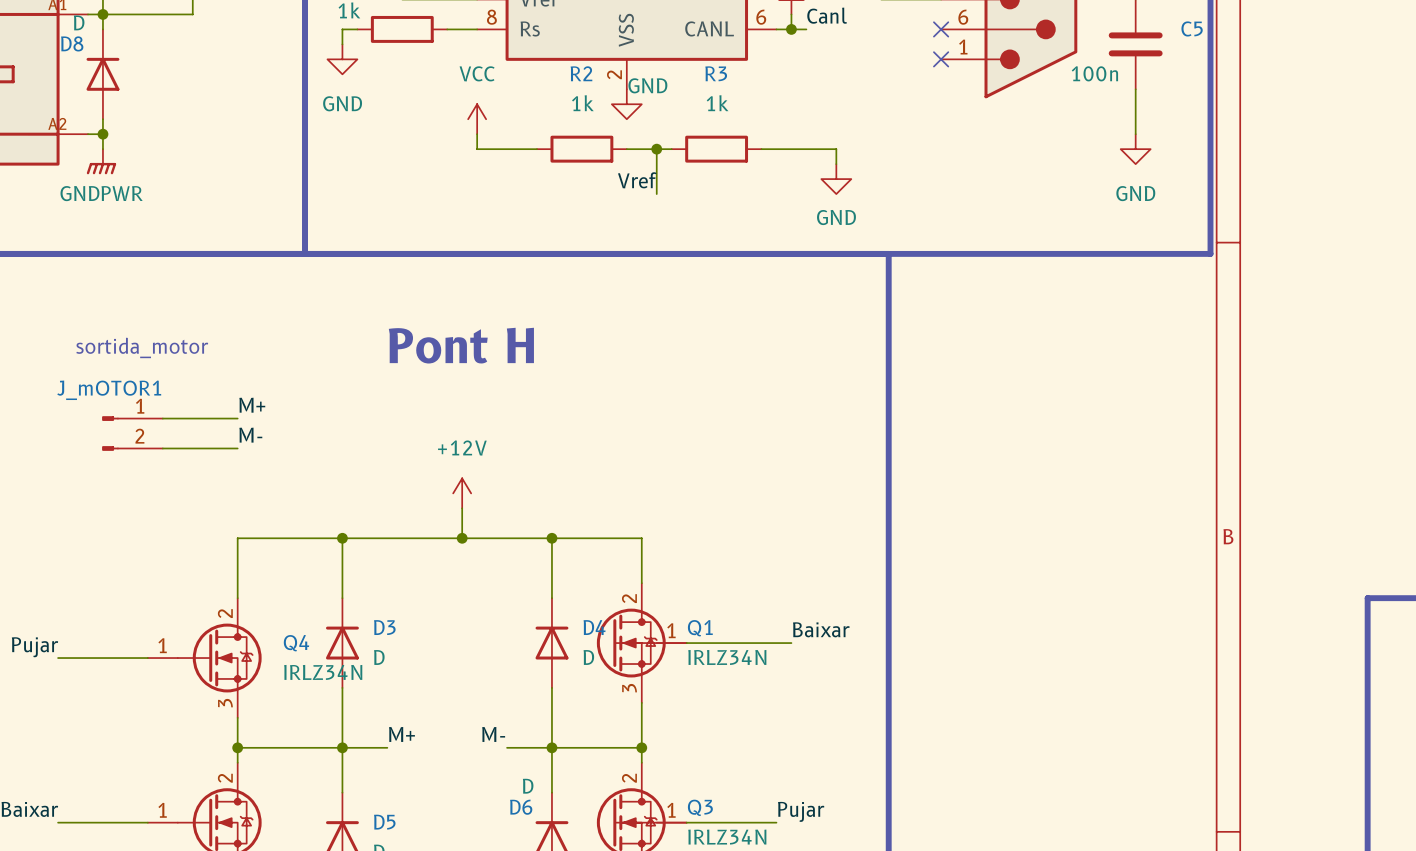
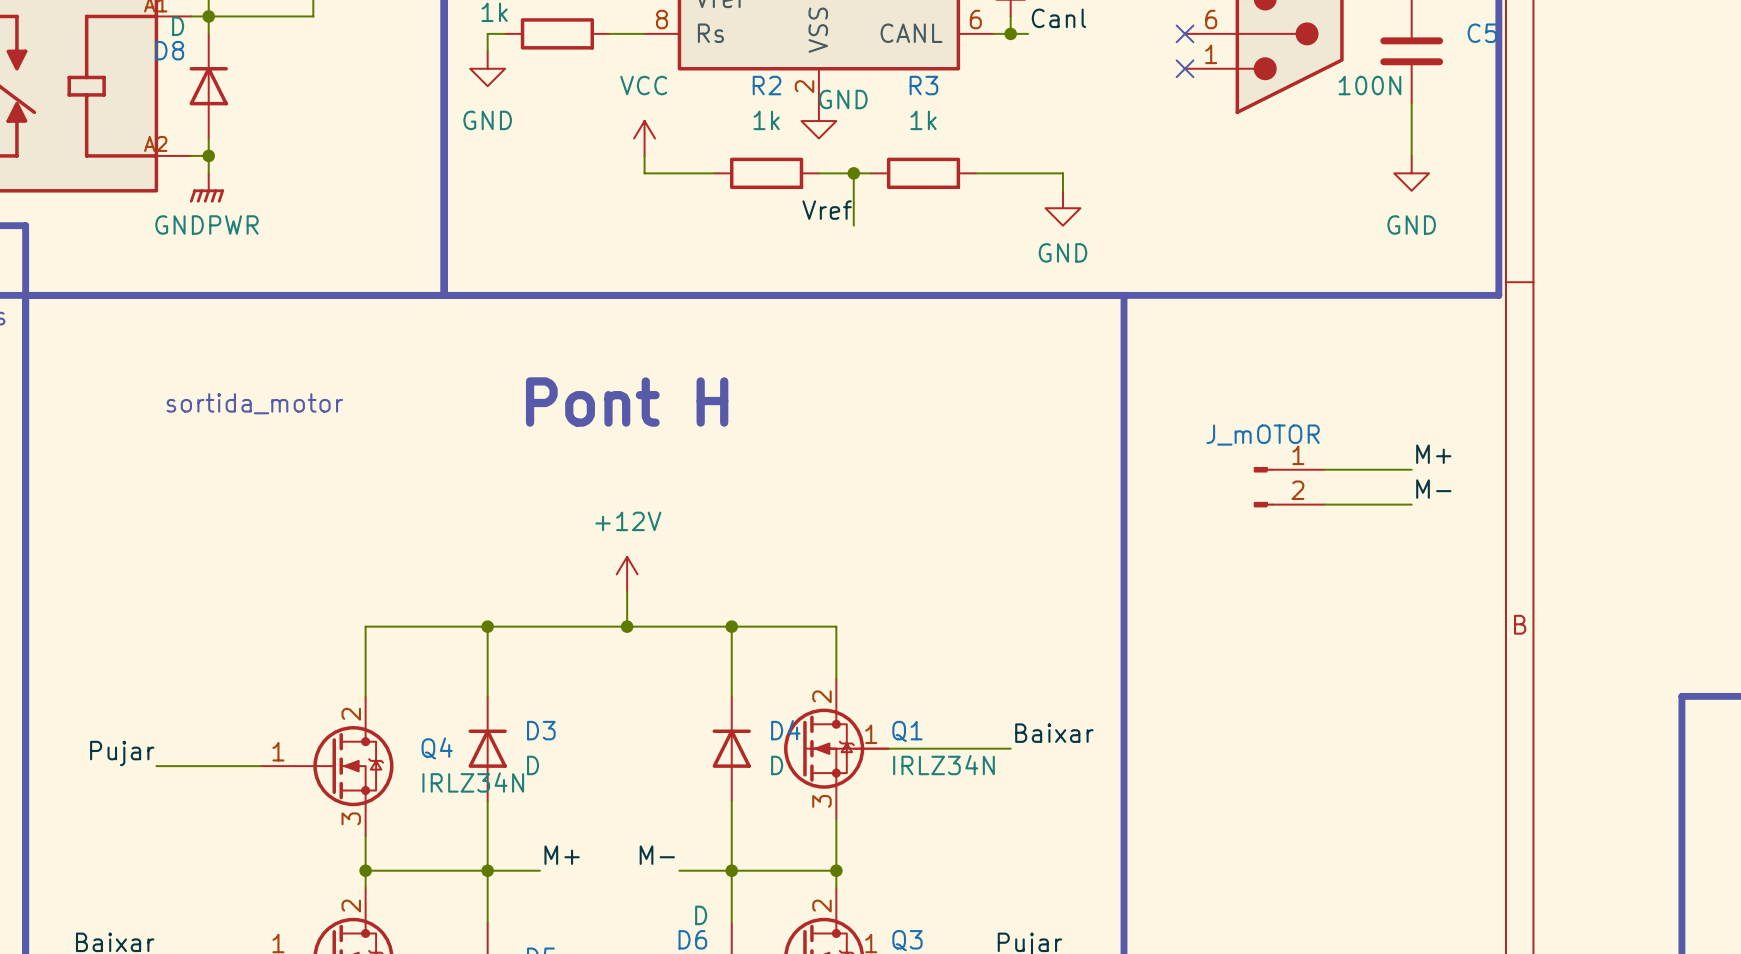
C5 value: 100n (1094, 73) -> 100N (1369, 85)
label: none -> M+ (1433, 454)
wire: none -> (1324, 469) (1411, 469)
label: M+ (252, 405) -> none
wire: (162, 418) (237, 418) -> none
J_mOTOR: none -> (1289, 487)
label: none -> M- (1433, 489)
J_mOTOR1: (132, 433) -> none
wire: none -> (1324, 504) (1411, 504)
label: M- (250, 435) -> none
wire: (162, 448) (237, 448) -> none

